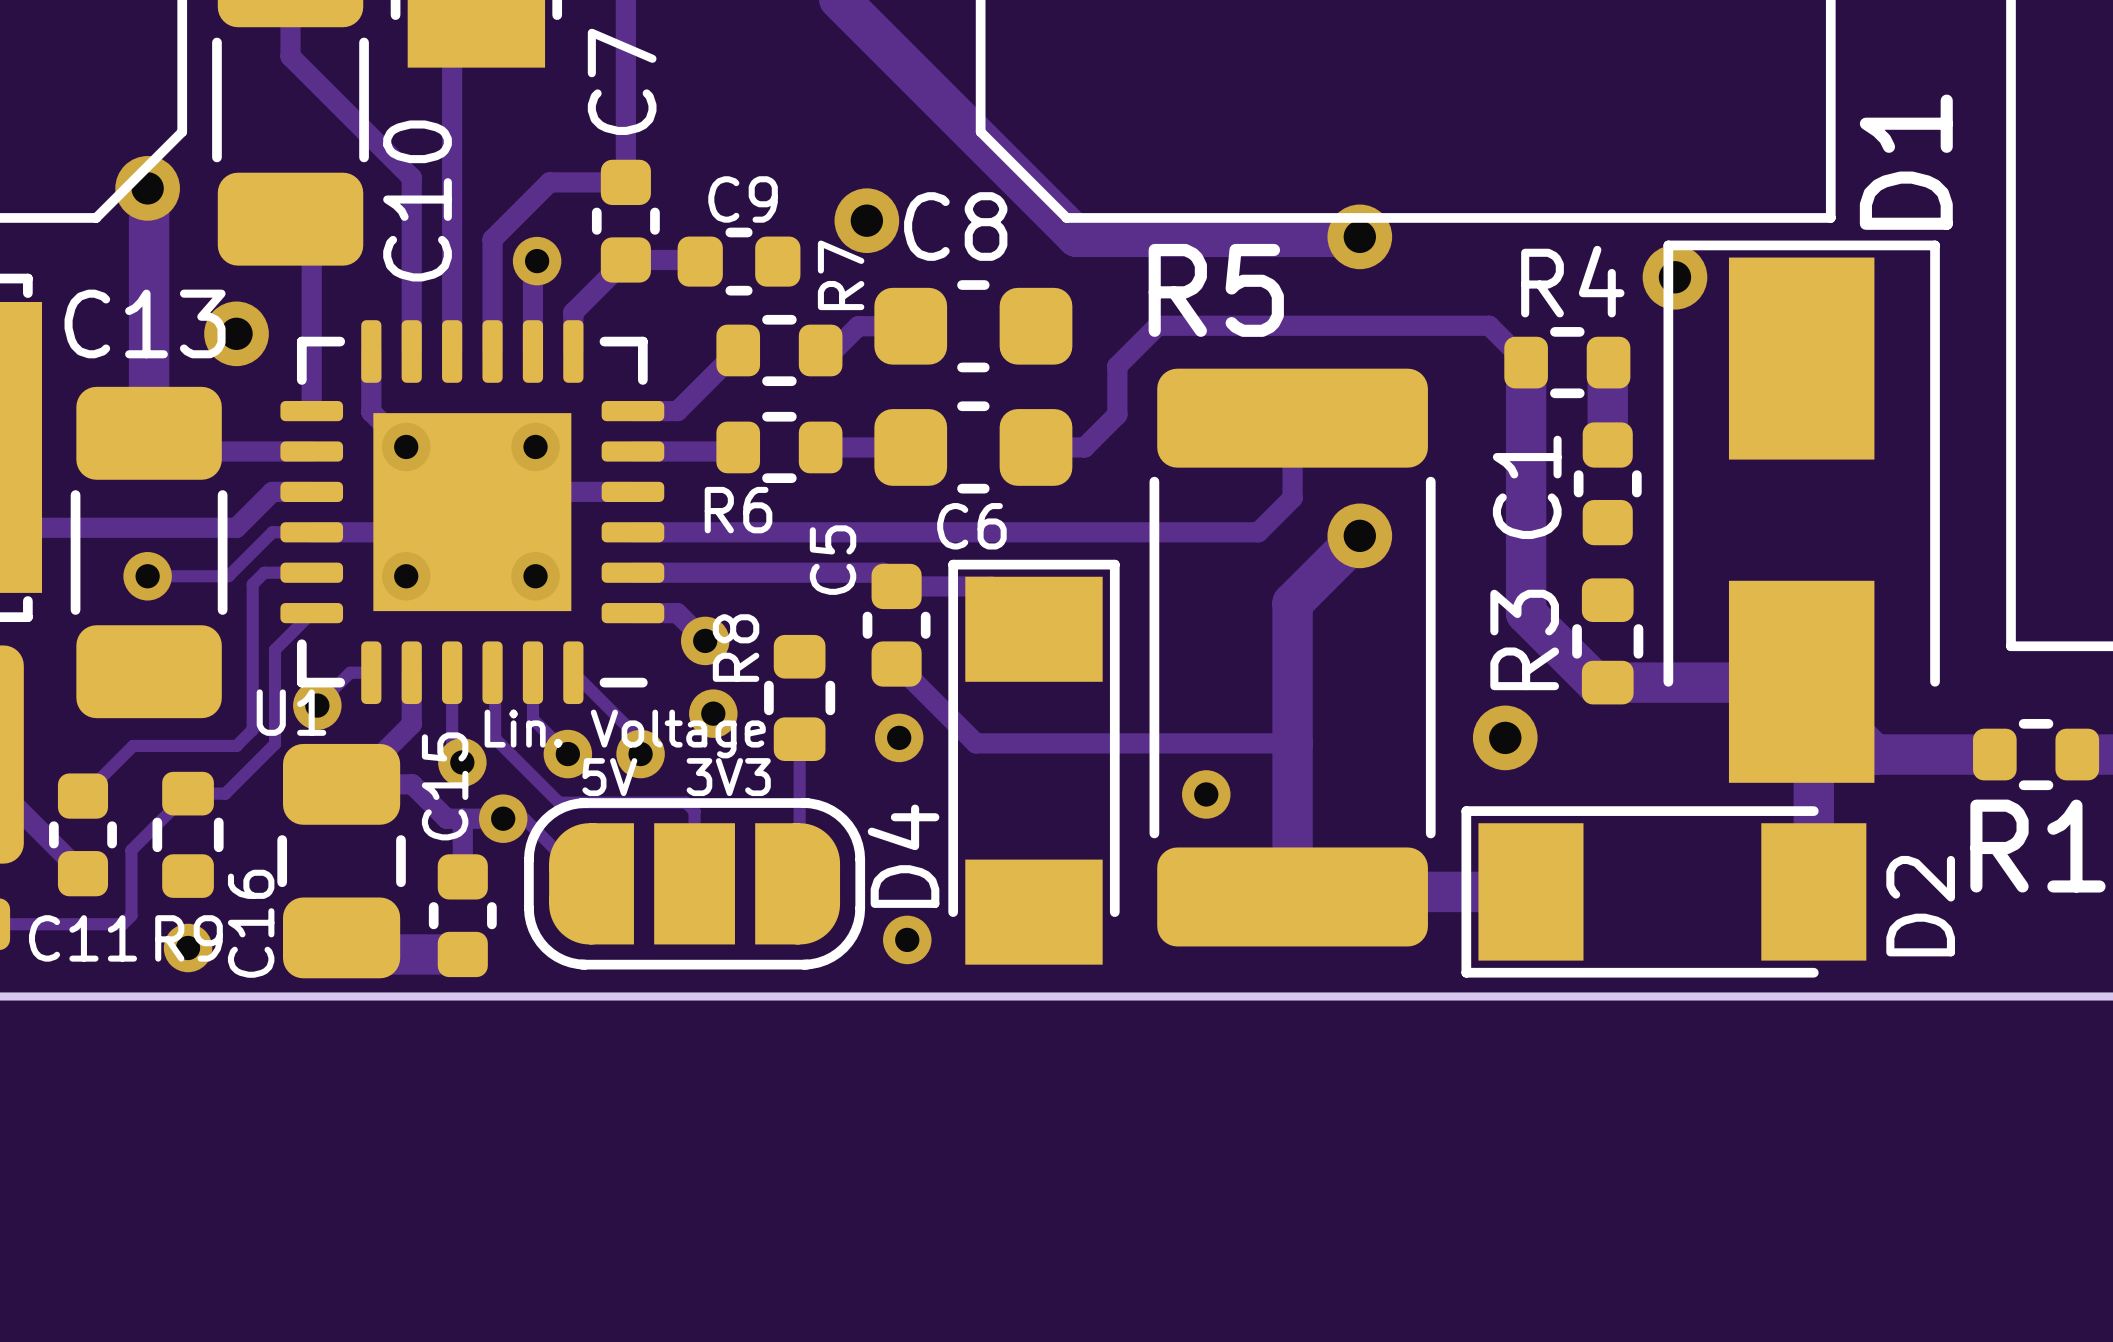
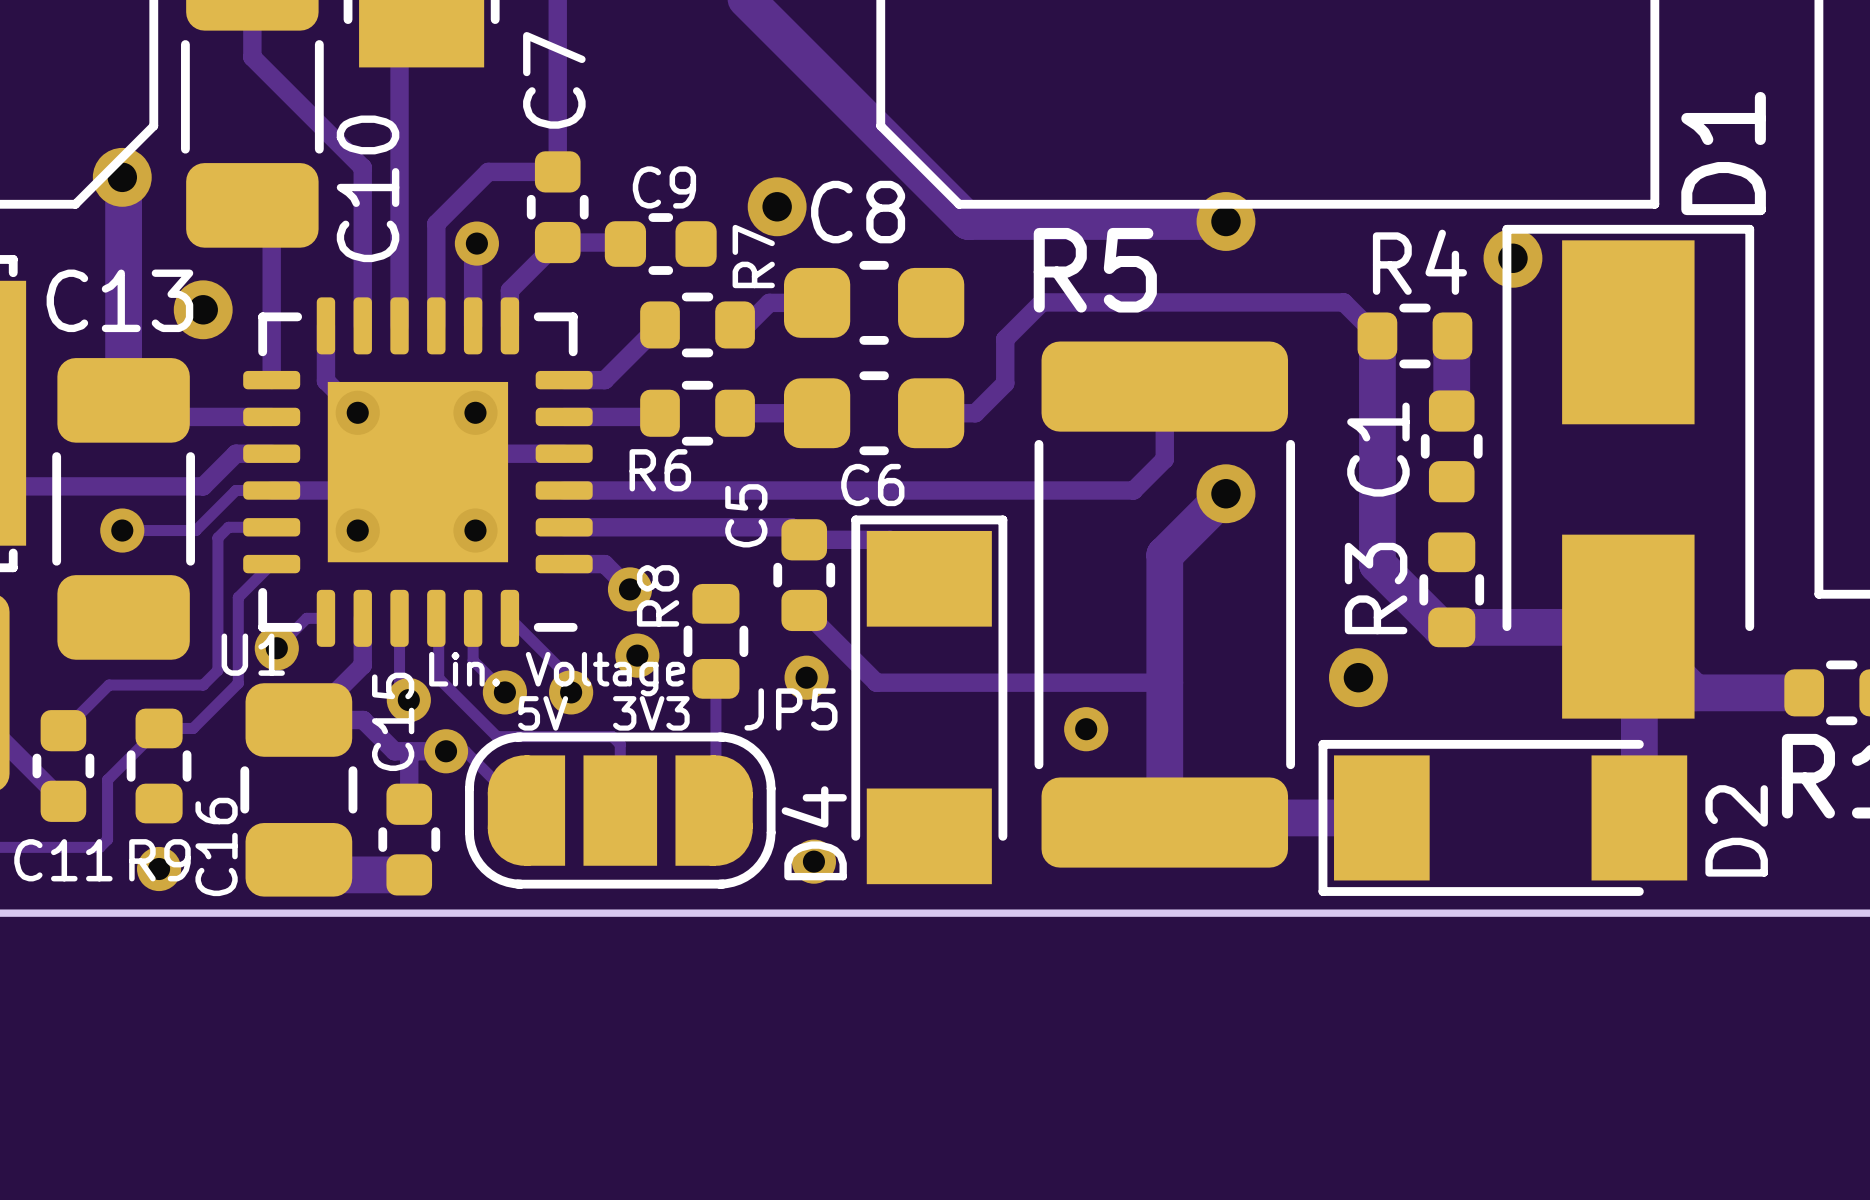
JP5 name: none -> JP5 (790, 709)
D4 name position: D4 (903, 856) -> D4 (814, 833)

